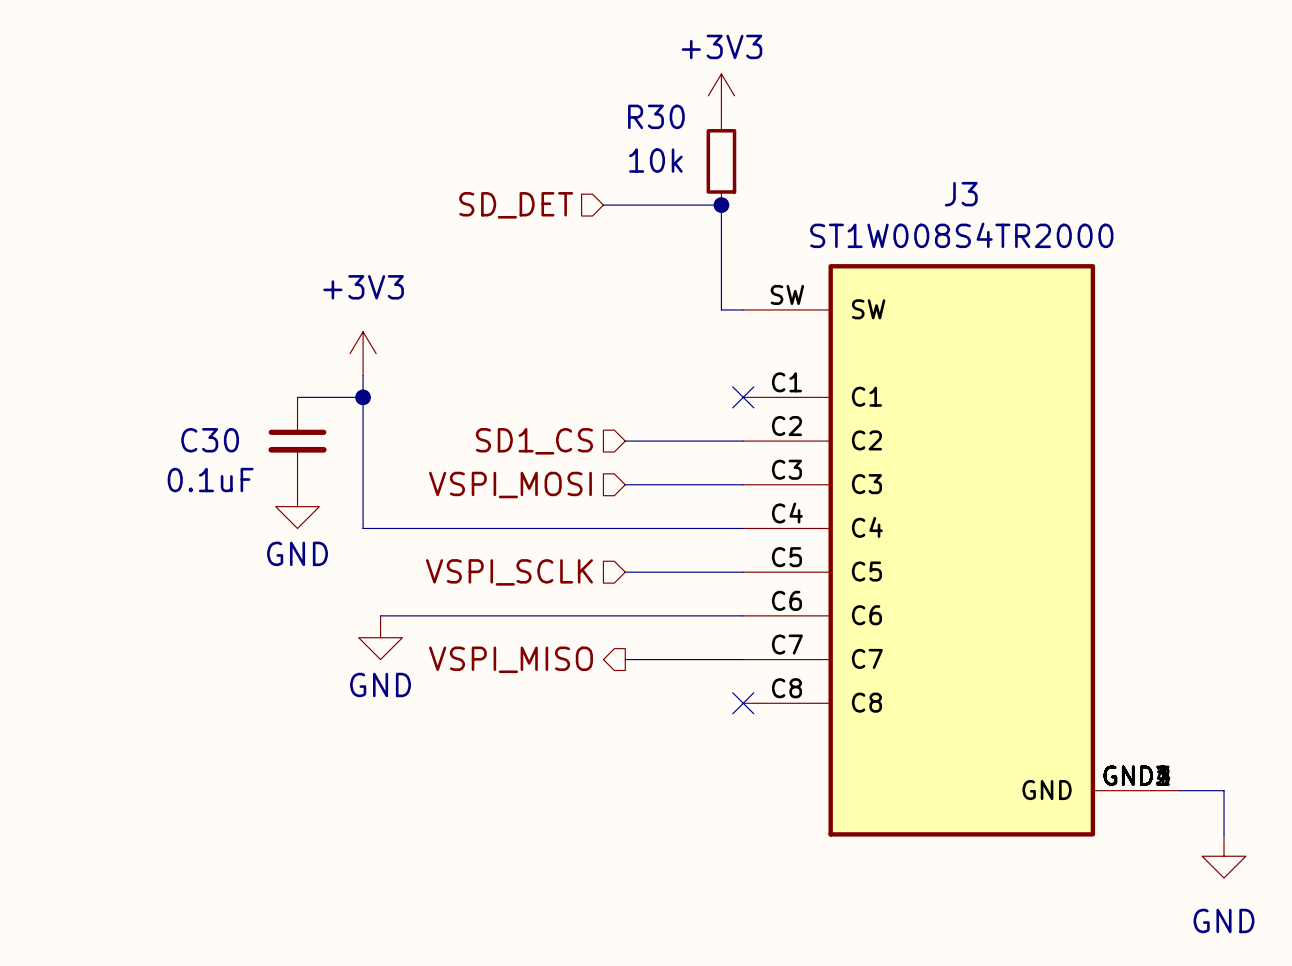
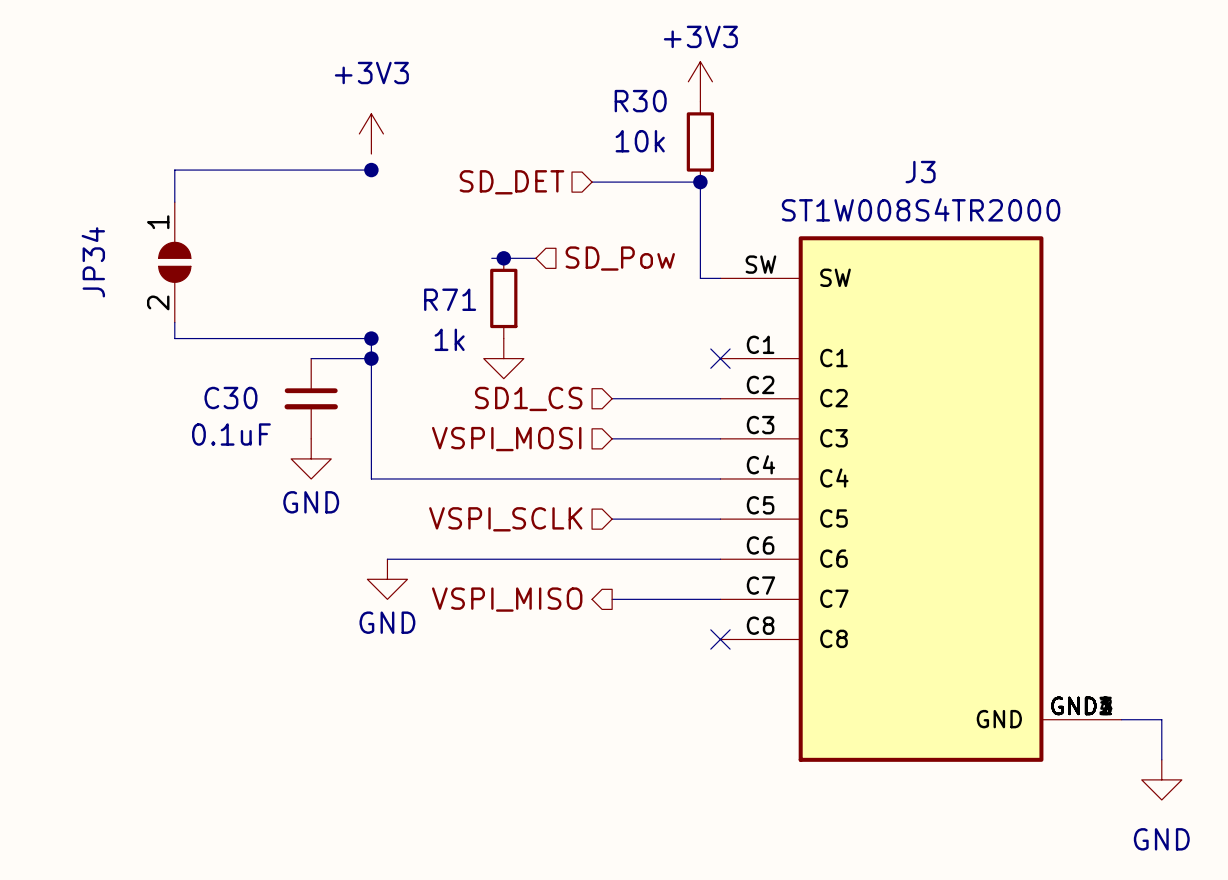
wire: none -> (371, 170) (174, 170) (174, 202)
junction: none -> (371, 170)
wire: none -> (491, 258) (535, 258)
junction: none -> (503, 258)
hierarchical label: none -> SD_Pow (620, 258)
JP34: none -> (174, 262)
R71: none -> 1k (503, 298)
power symbol position: +3V3 (363, 353) -> +3V3 (371, 133)
wire: none -> (174, 322) (174, 338) (371, 338)
junction: none -> (371, 338)
power symbol: none -> (503, 358)

